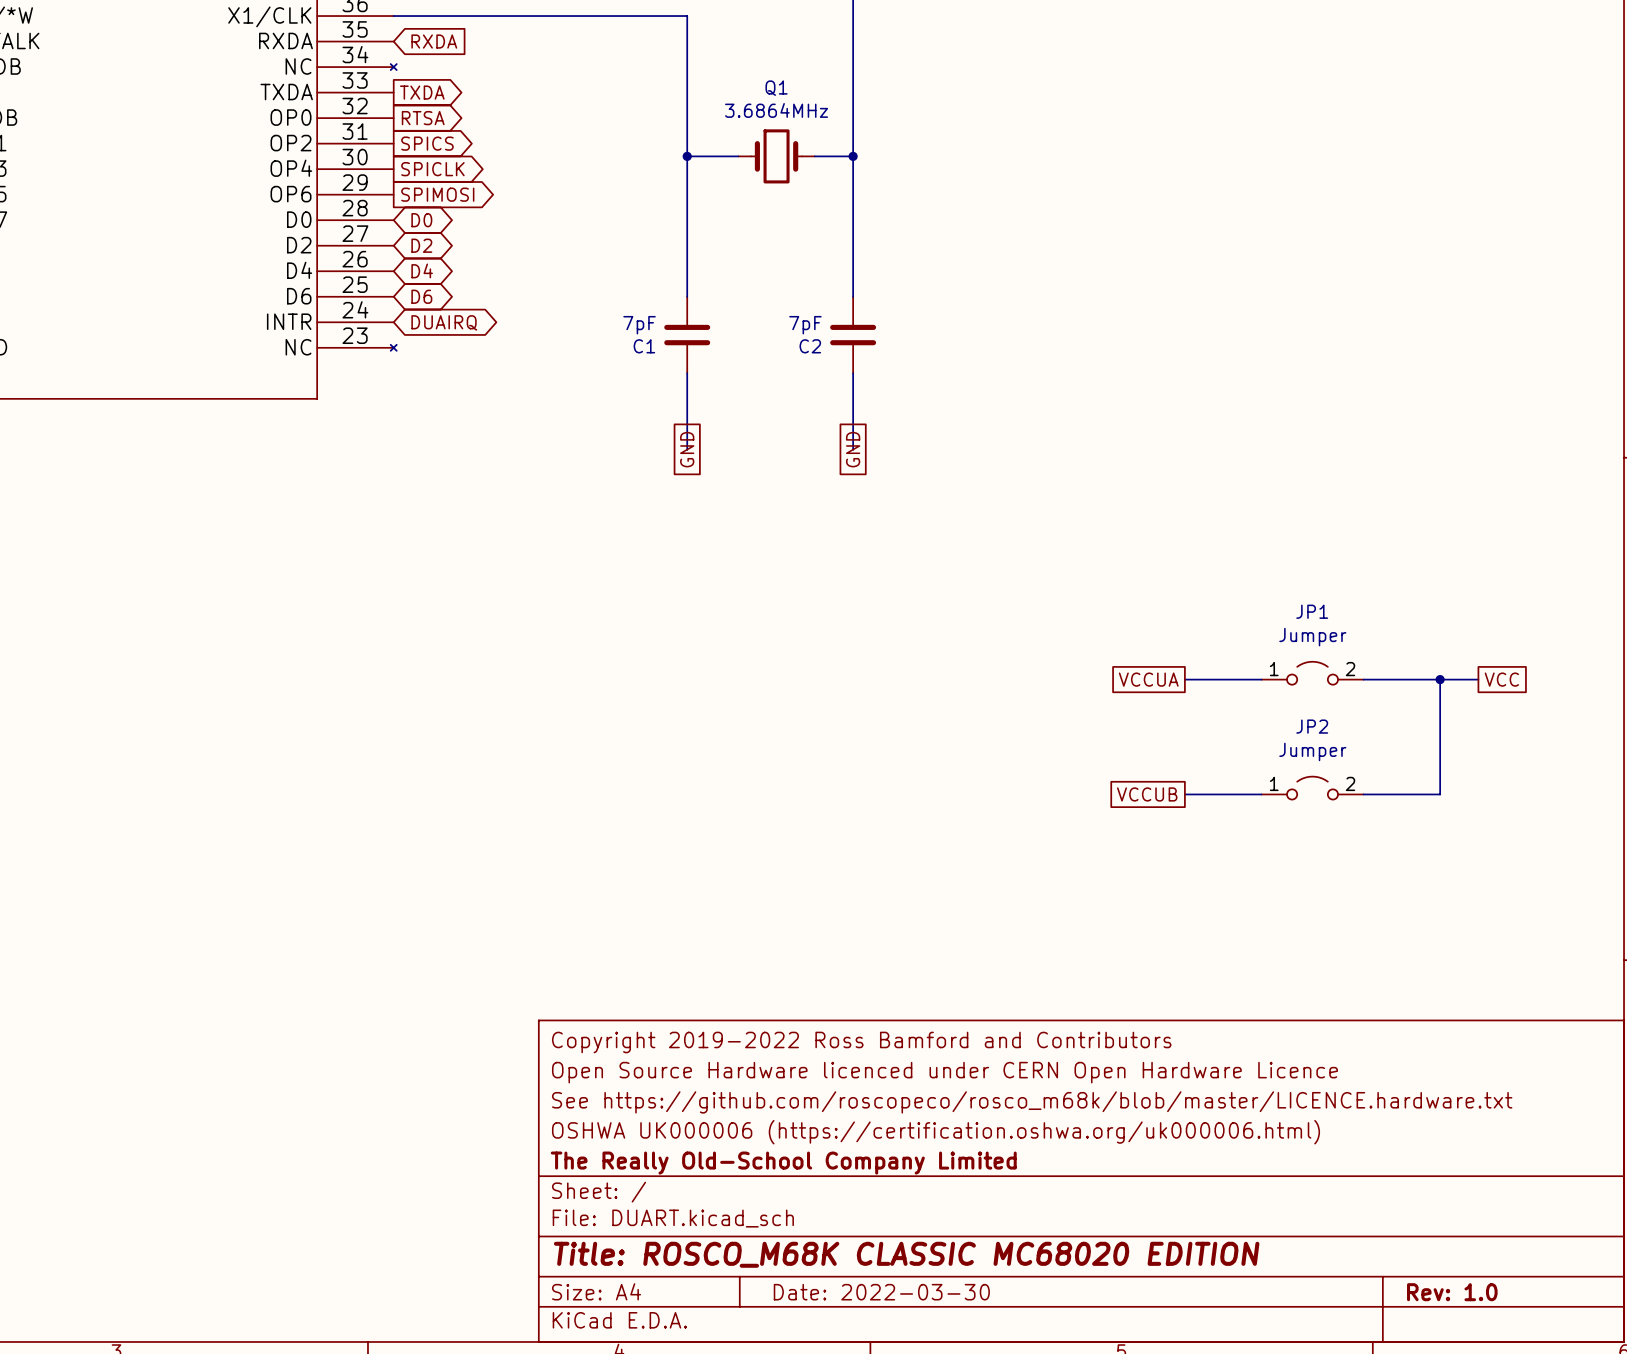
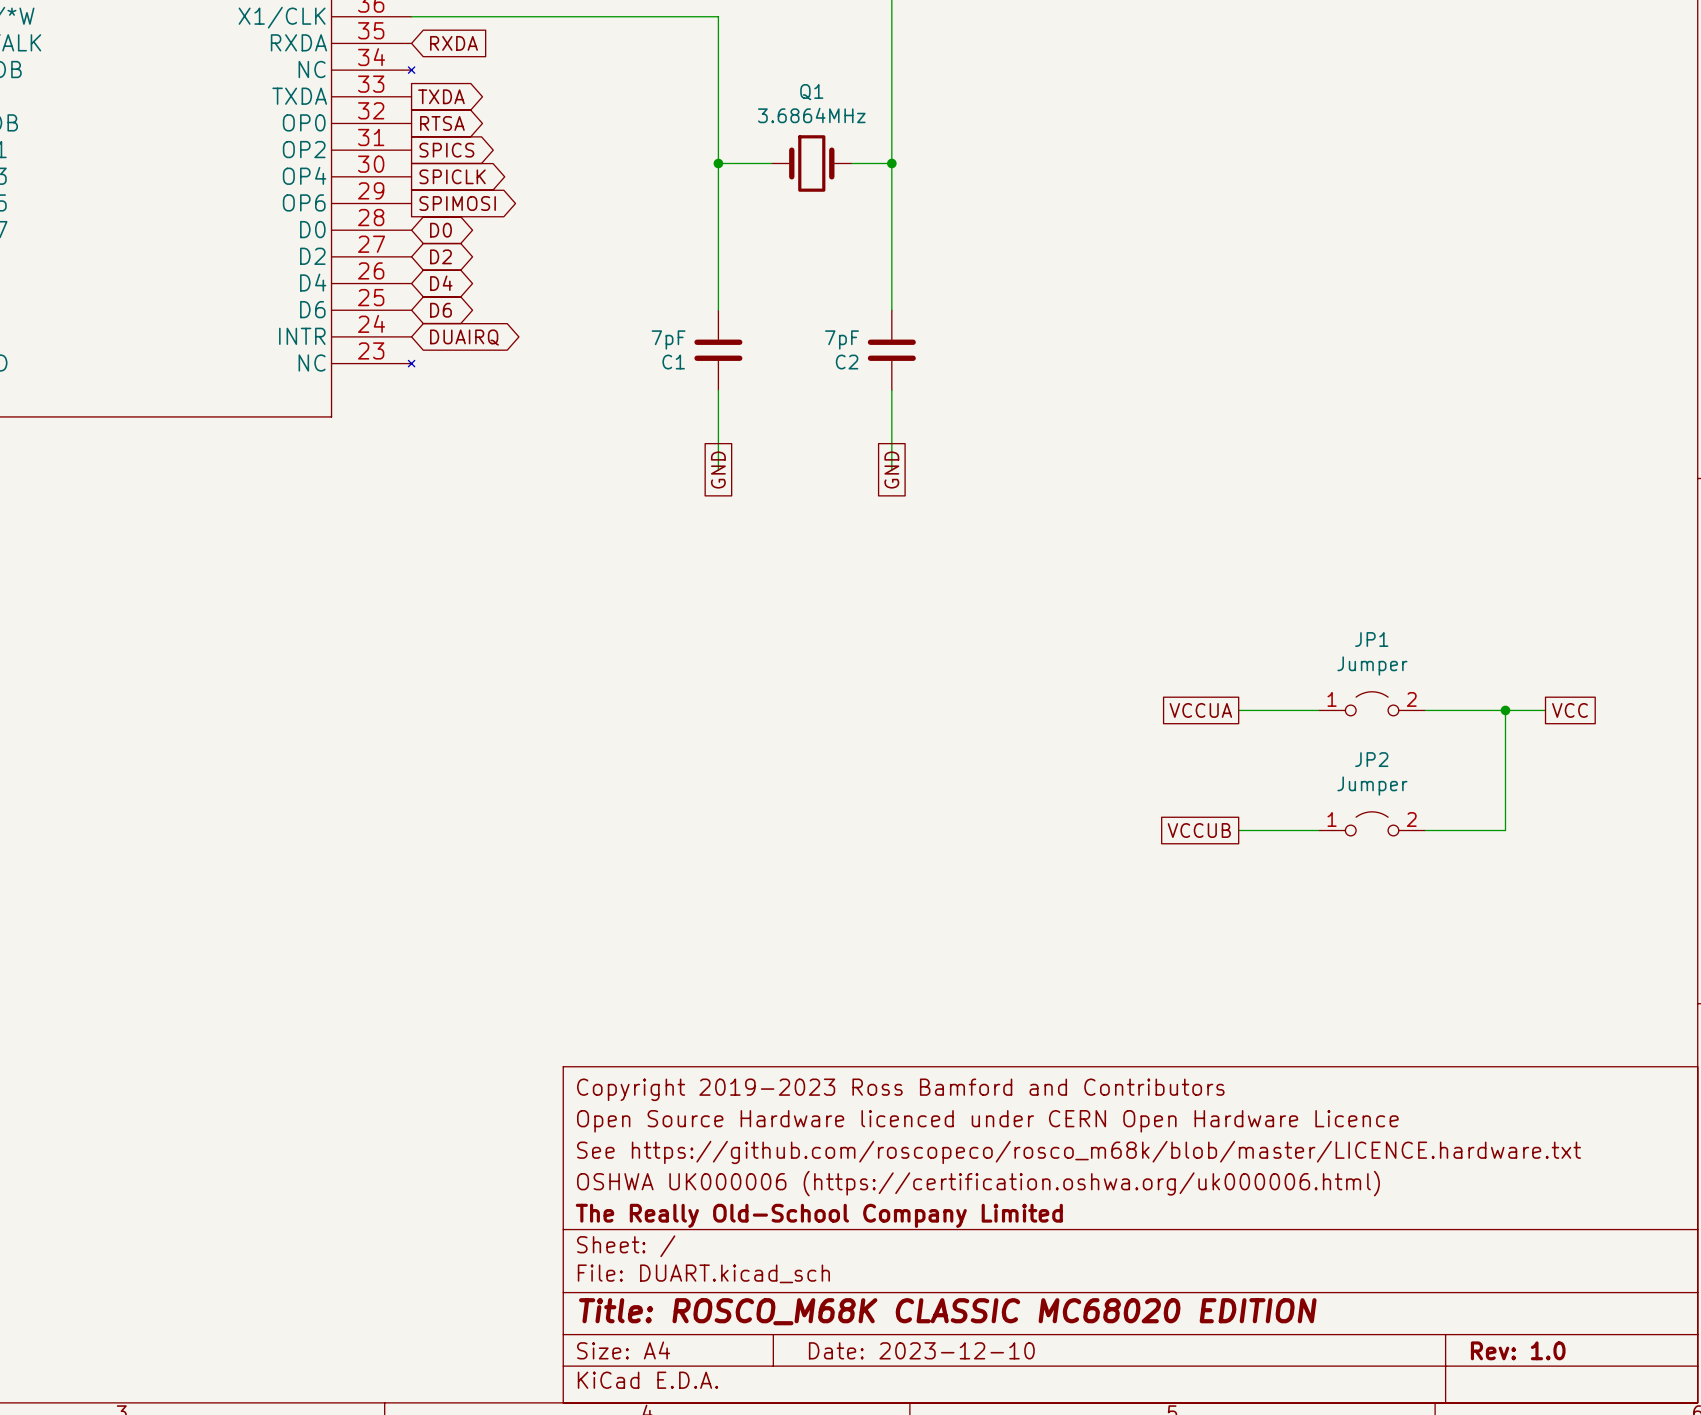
title block: Copyright 2019-2022 Ross Bamford and Contributors (861, 1042) -> Copyright 2019-2023 Ross Bamford and Contributors (900, 1089)
title block: Date: 2022-03-30 (881, 1292) -> Date: 2023-12-10 (921, 1350)

